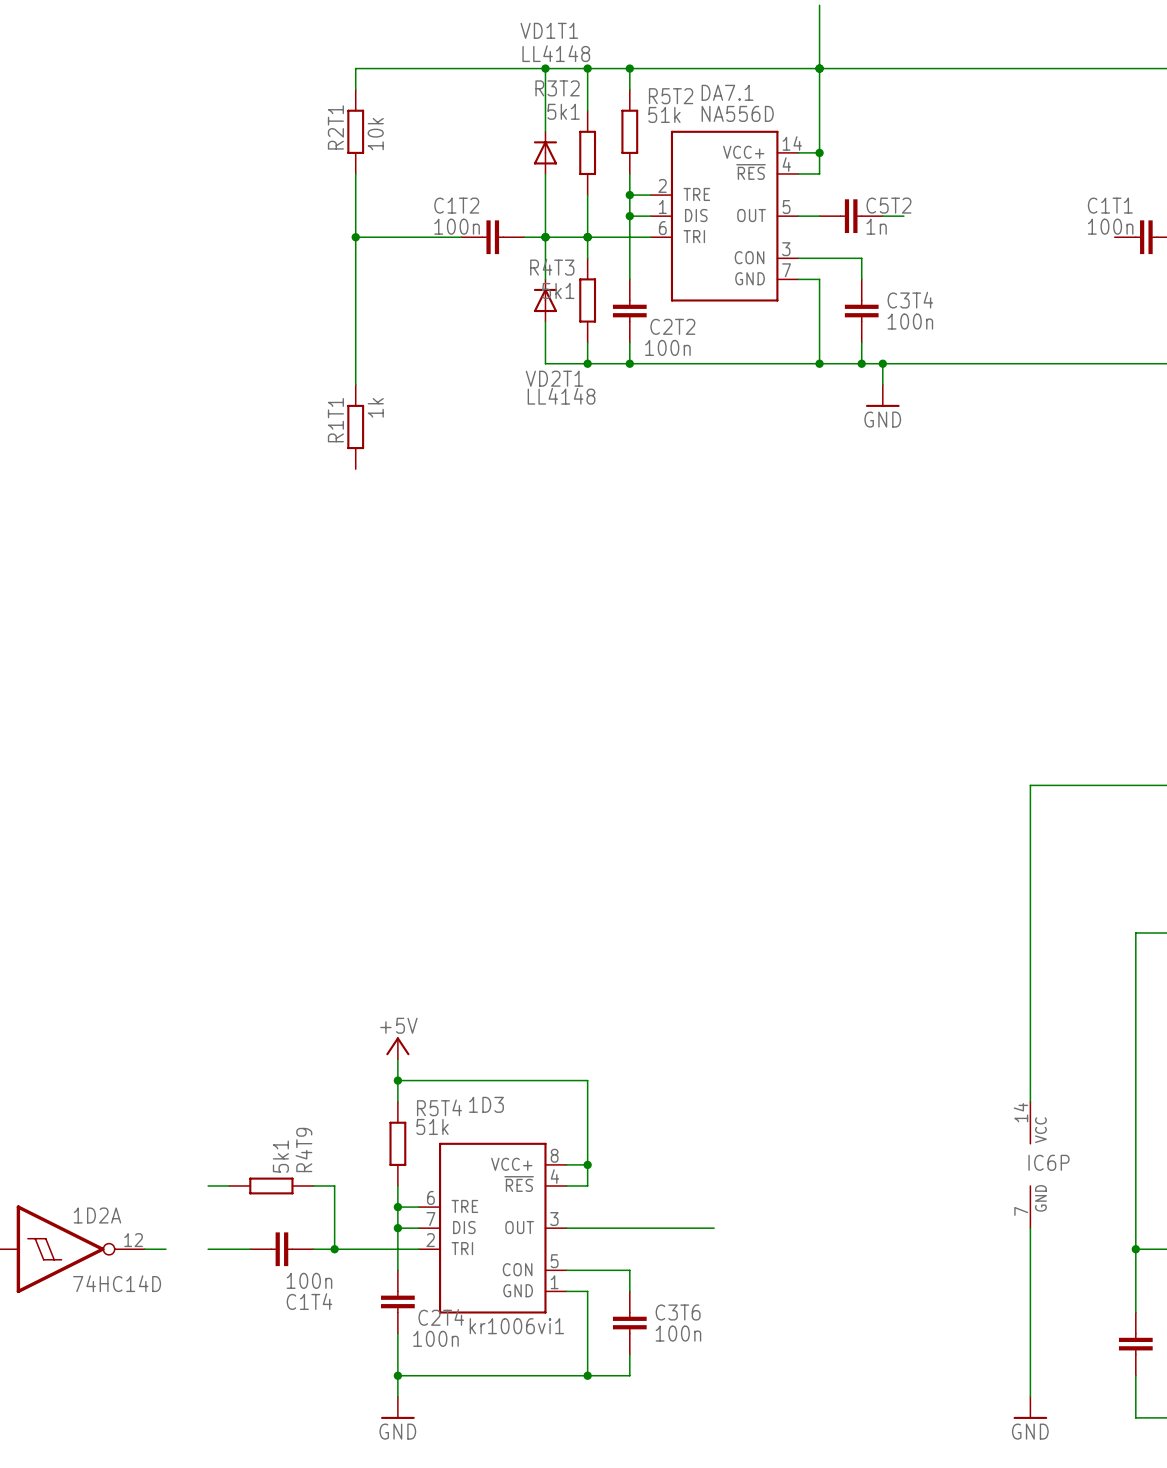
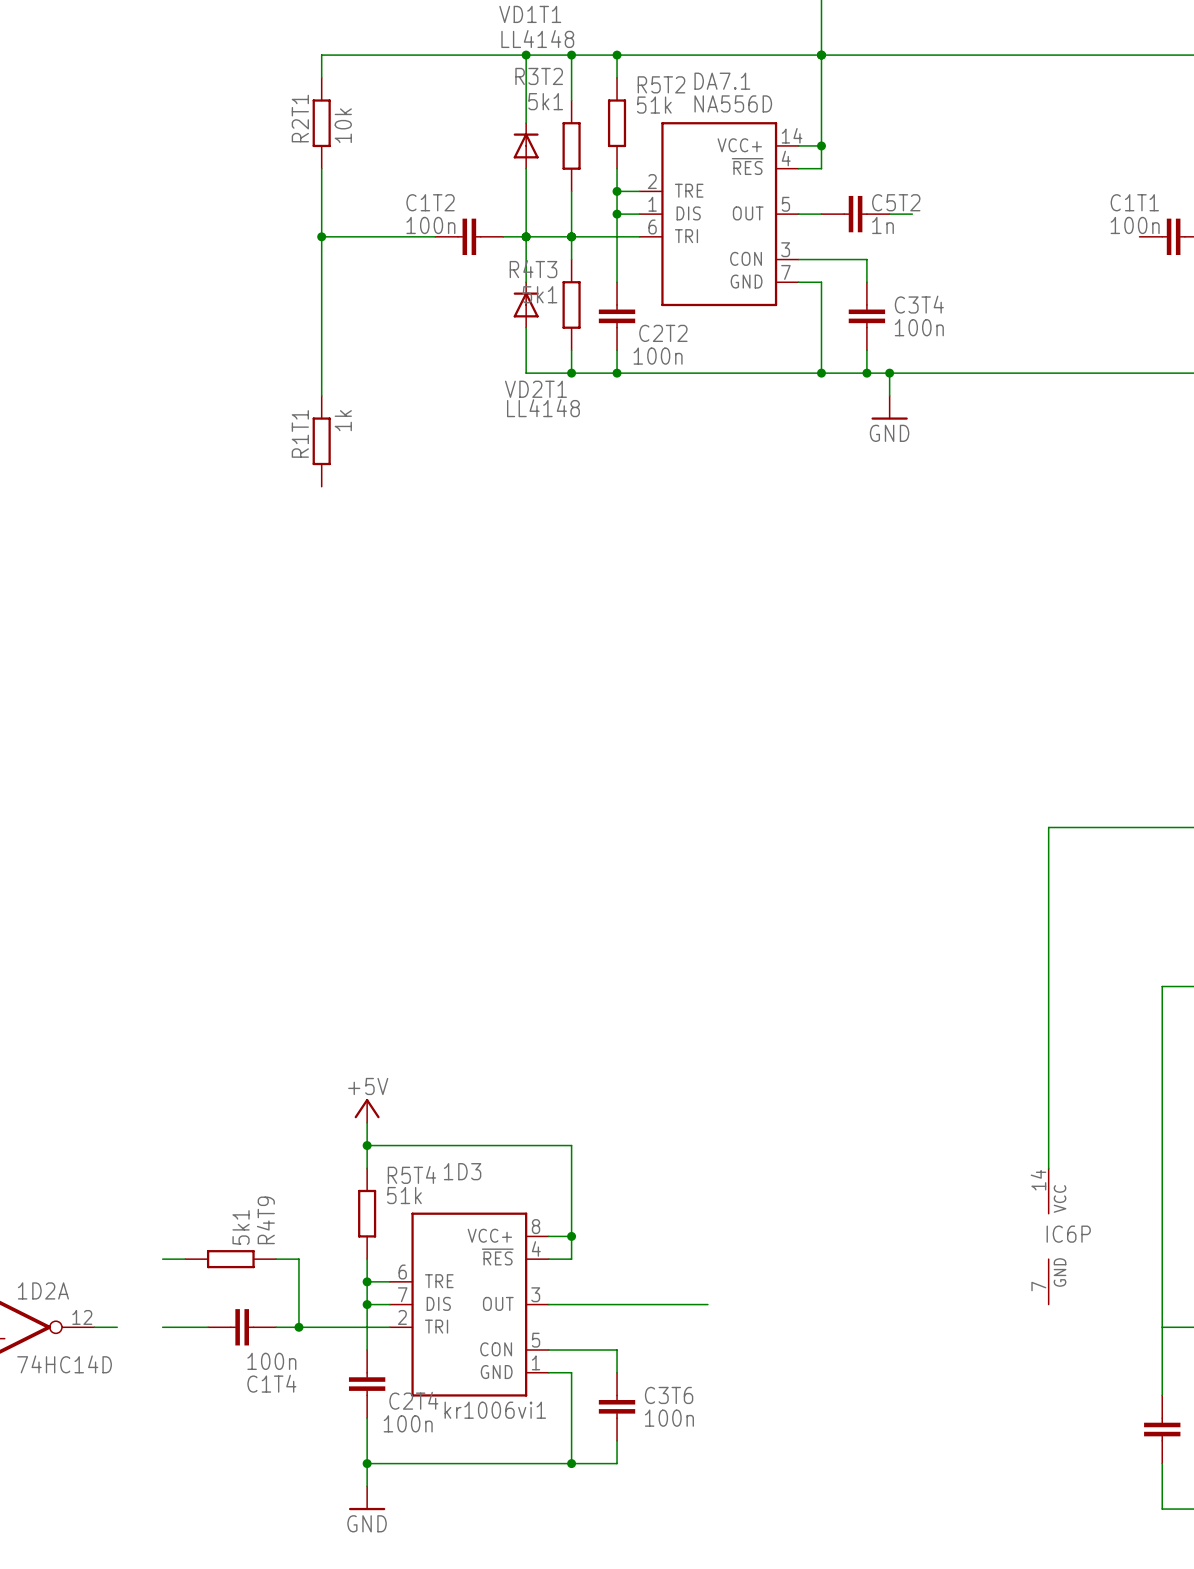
wire: (1030, 1228) (1030, 1396) -> none
junction: (1135, 1249) -> none
power symbol: GND (1030, 1407) -> none

